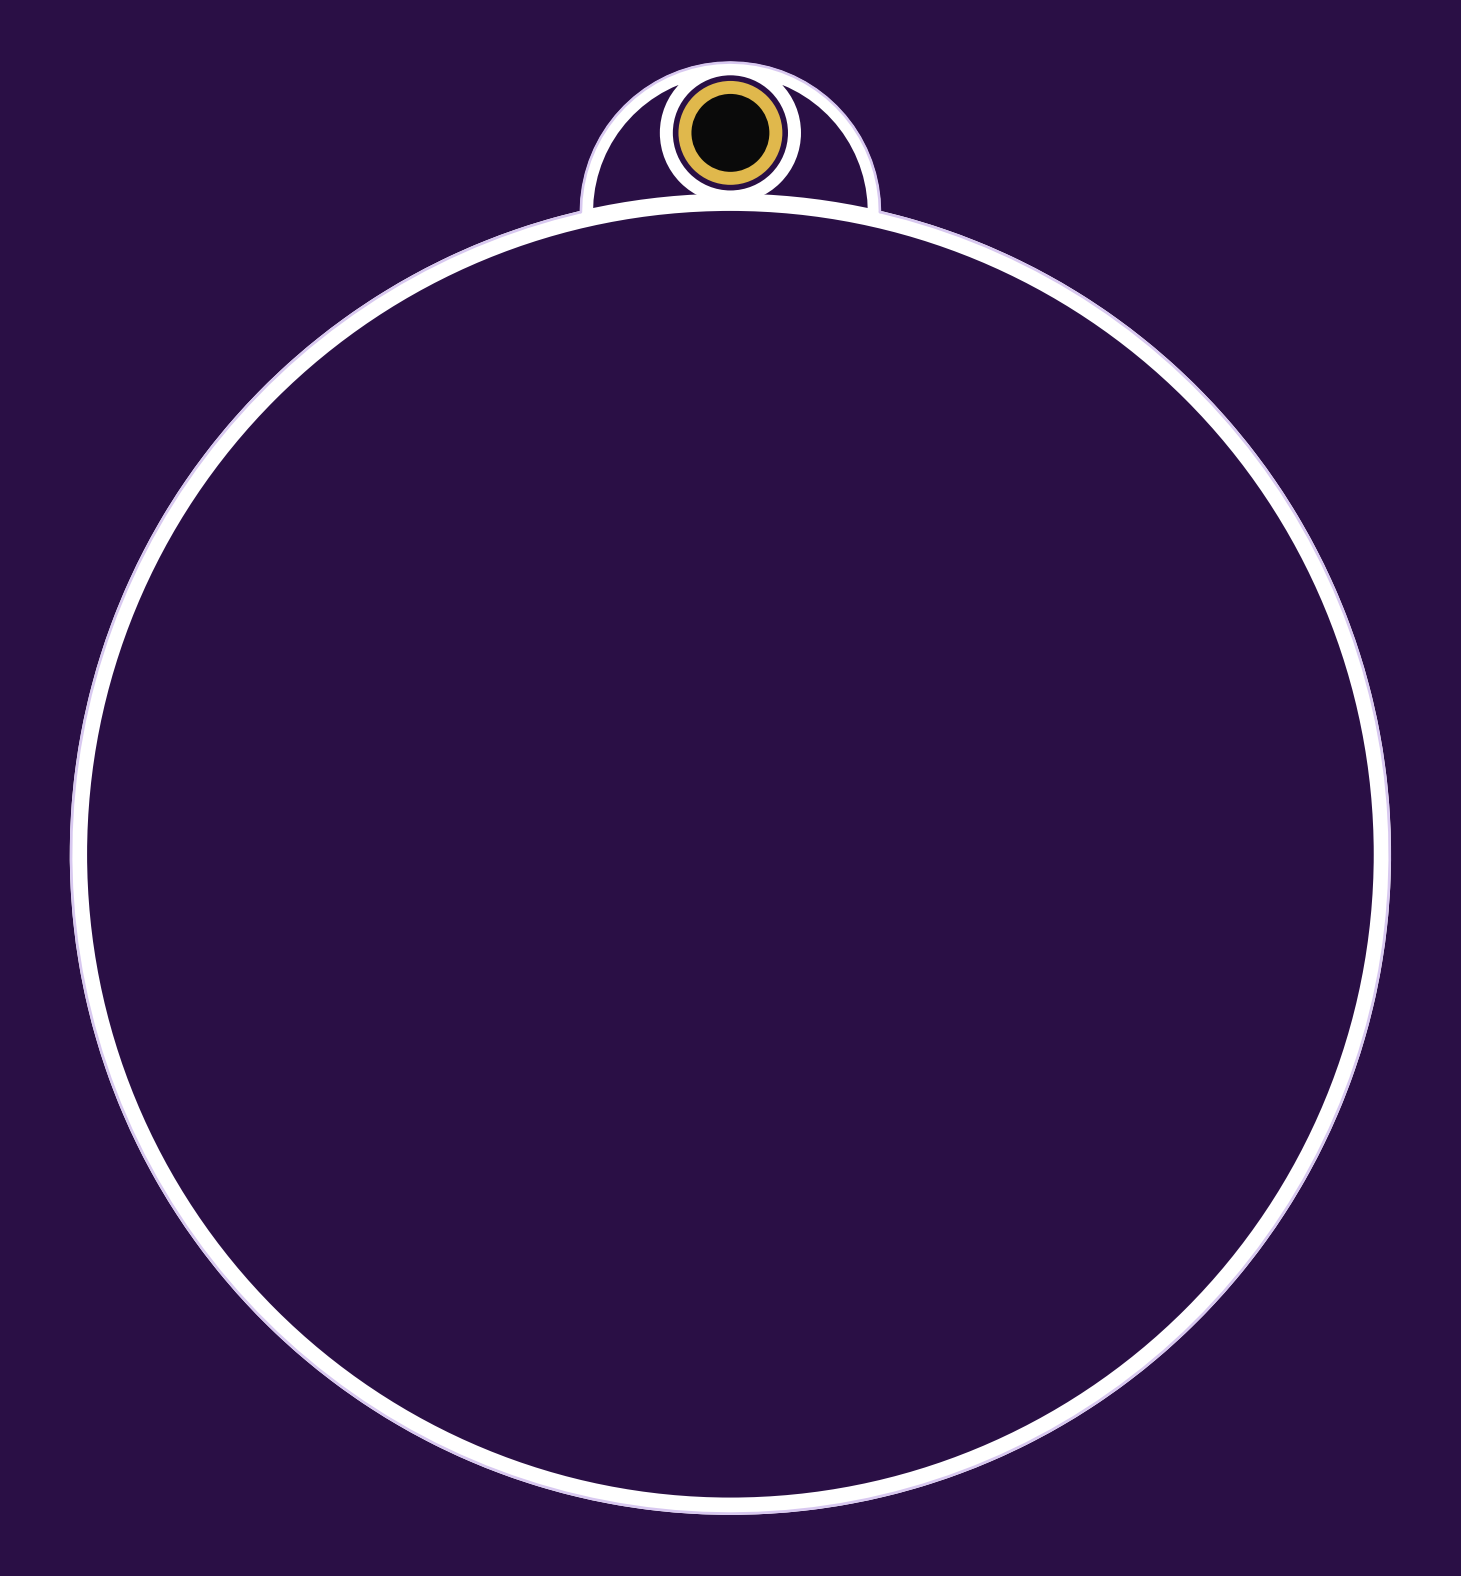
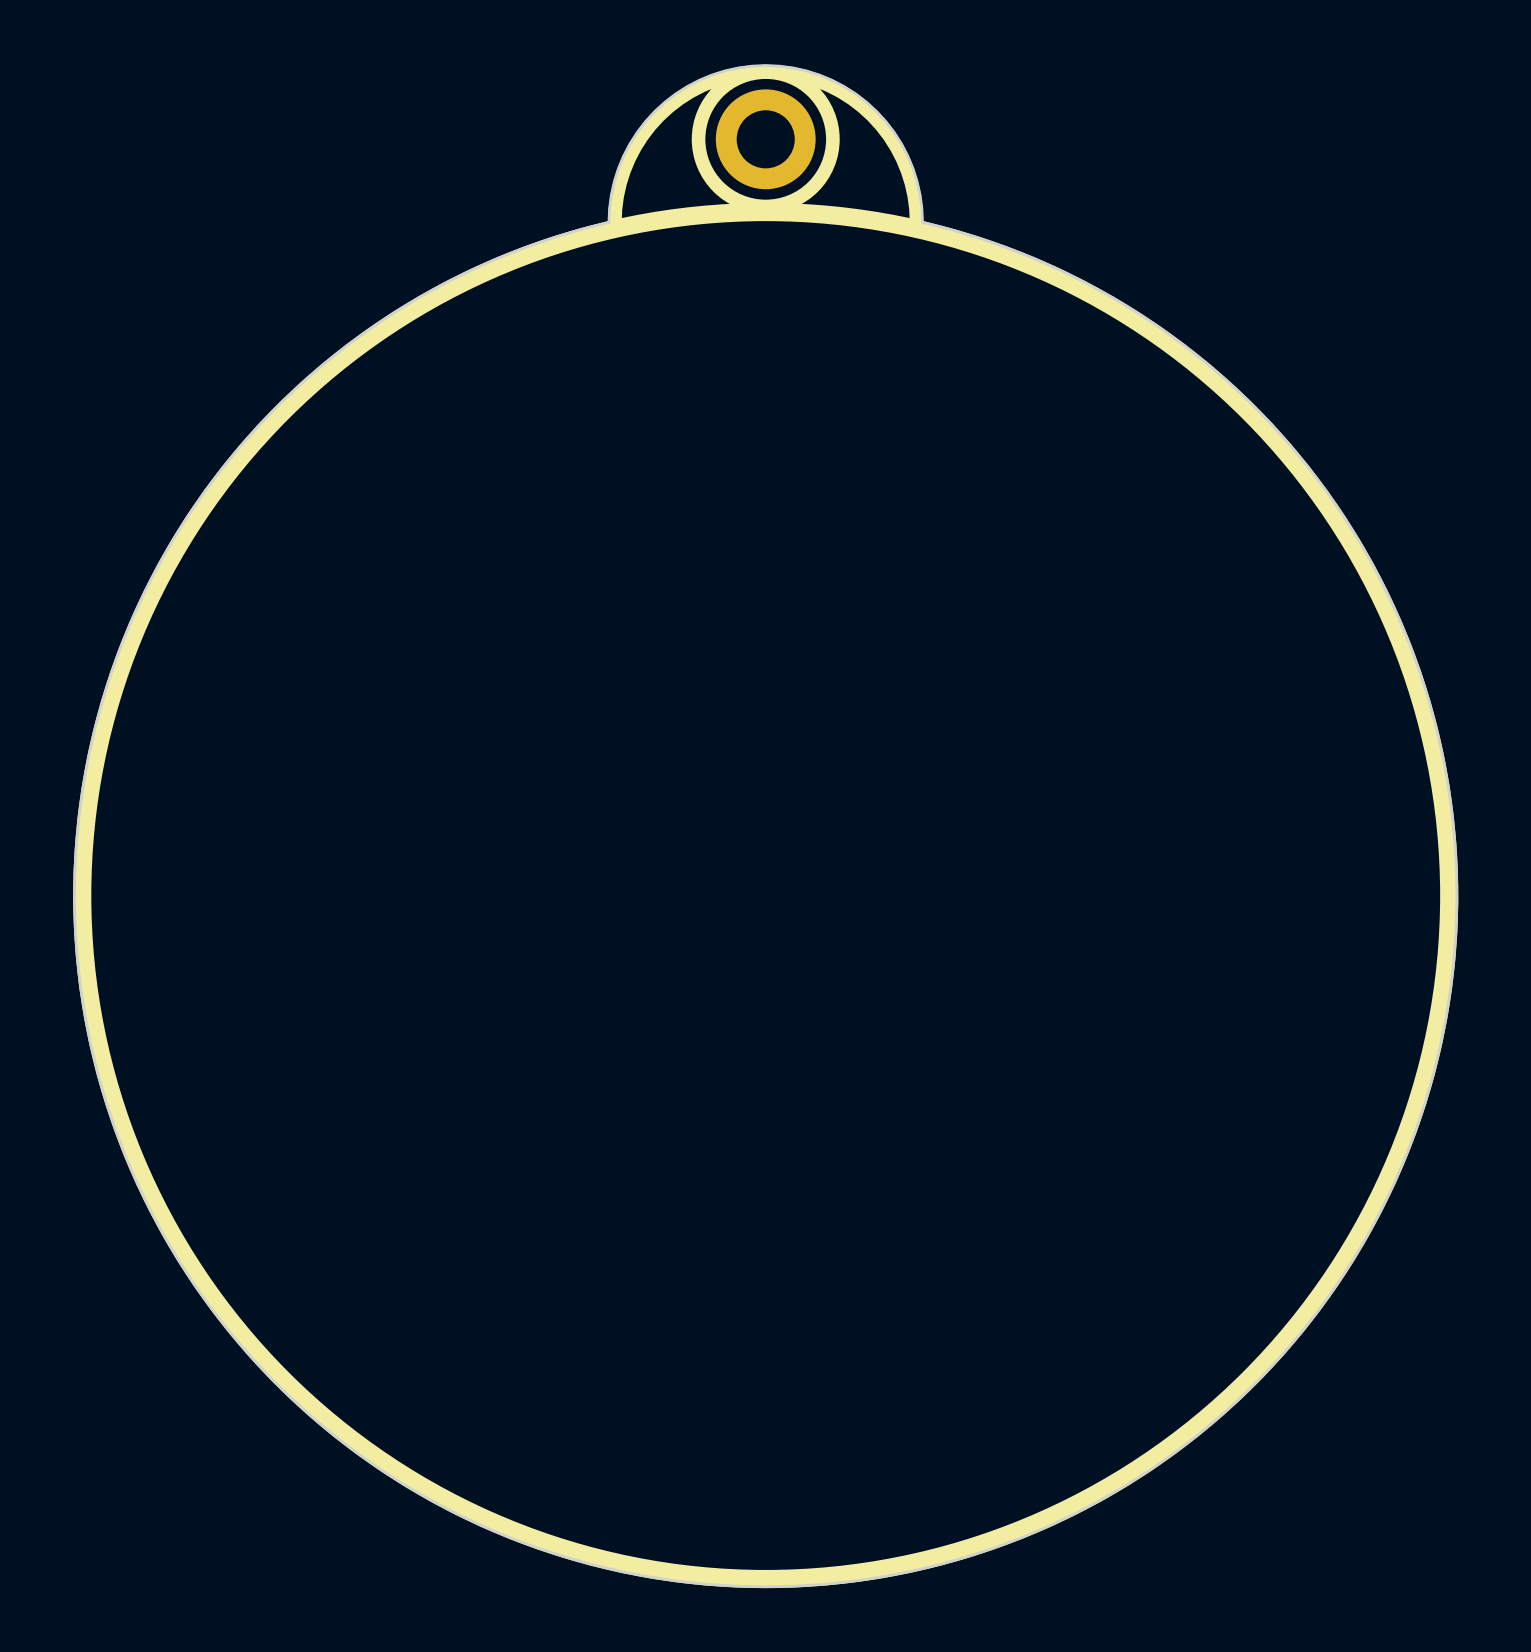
part footprint: [678, 80, 783, 185] -> [715, 89, 816, 190]

